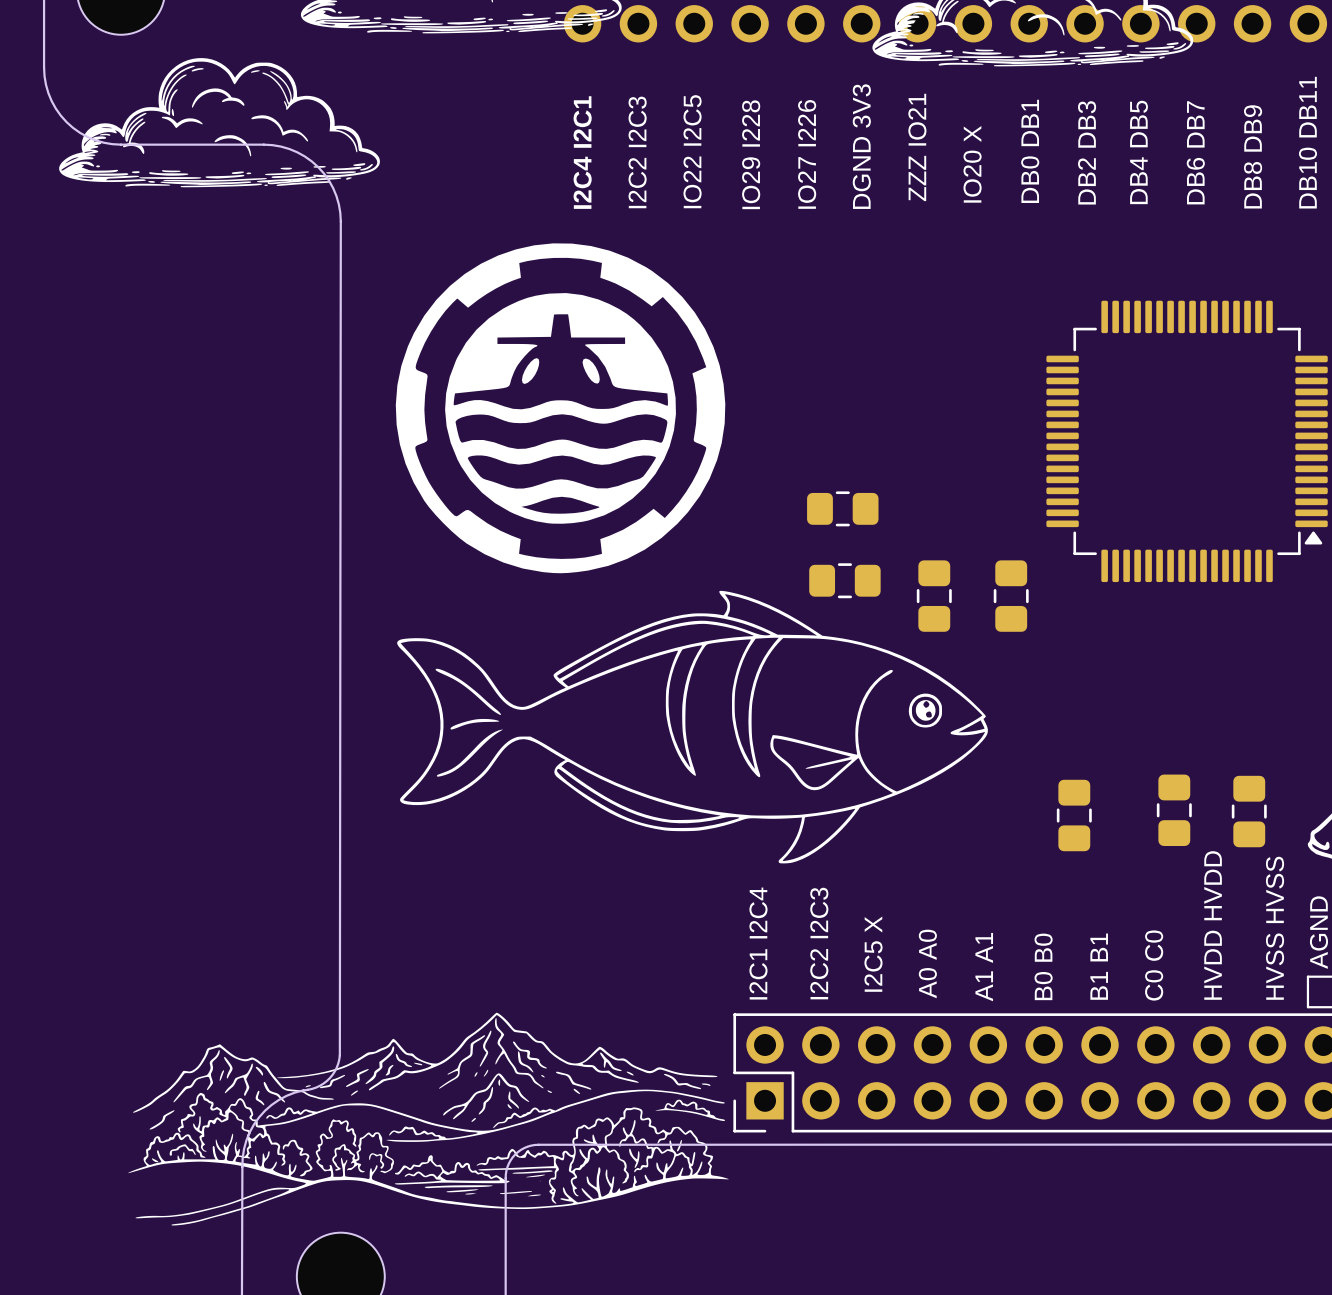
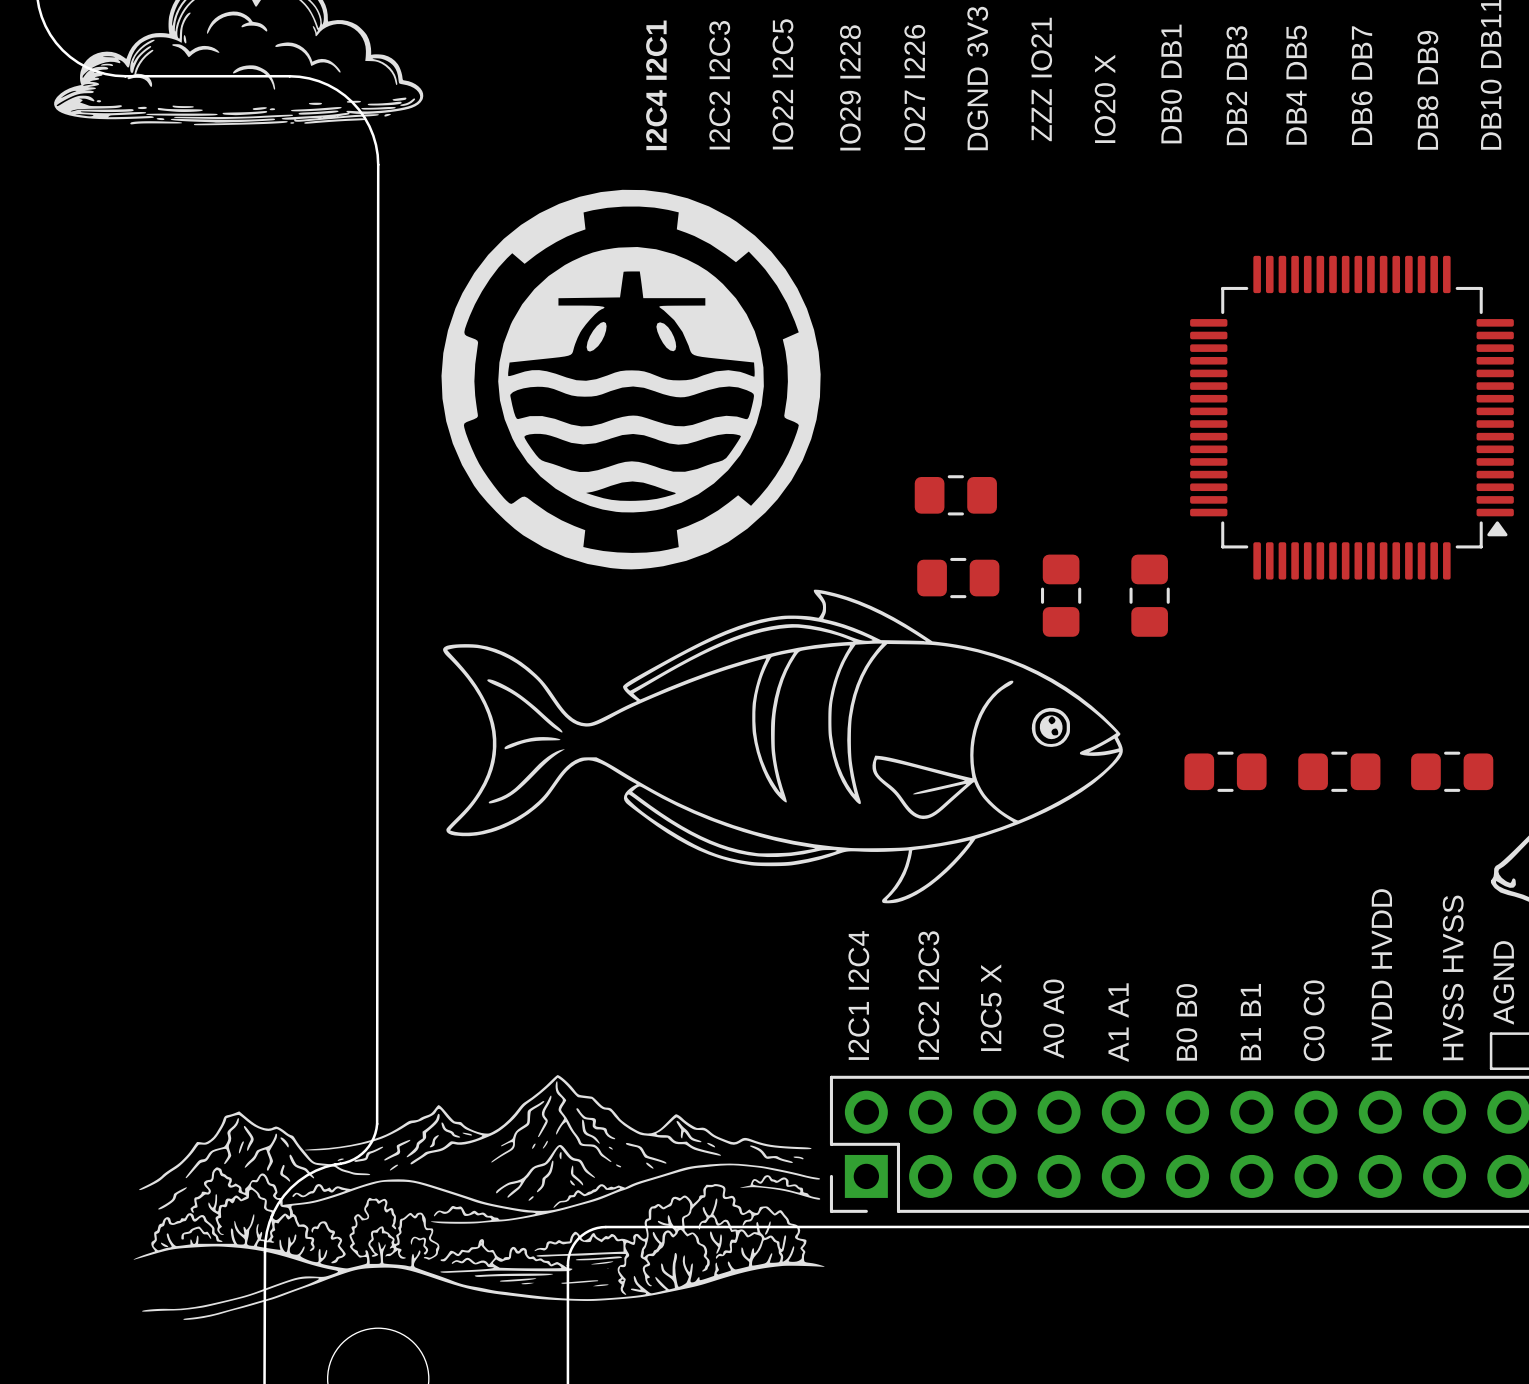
part: none -> (1225, 771)
part: none -> (1339, 771)
part: none -> (1452, 771)
part: (1174, 810) -> none
part: (1249, 811) -> none
part: (1074, 815) -> none

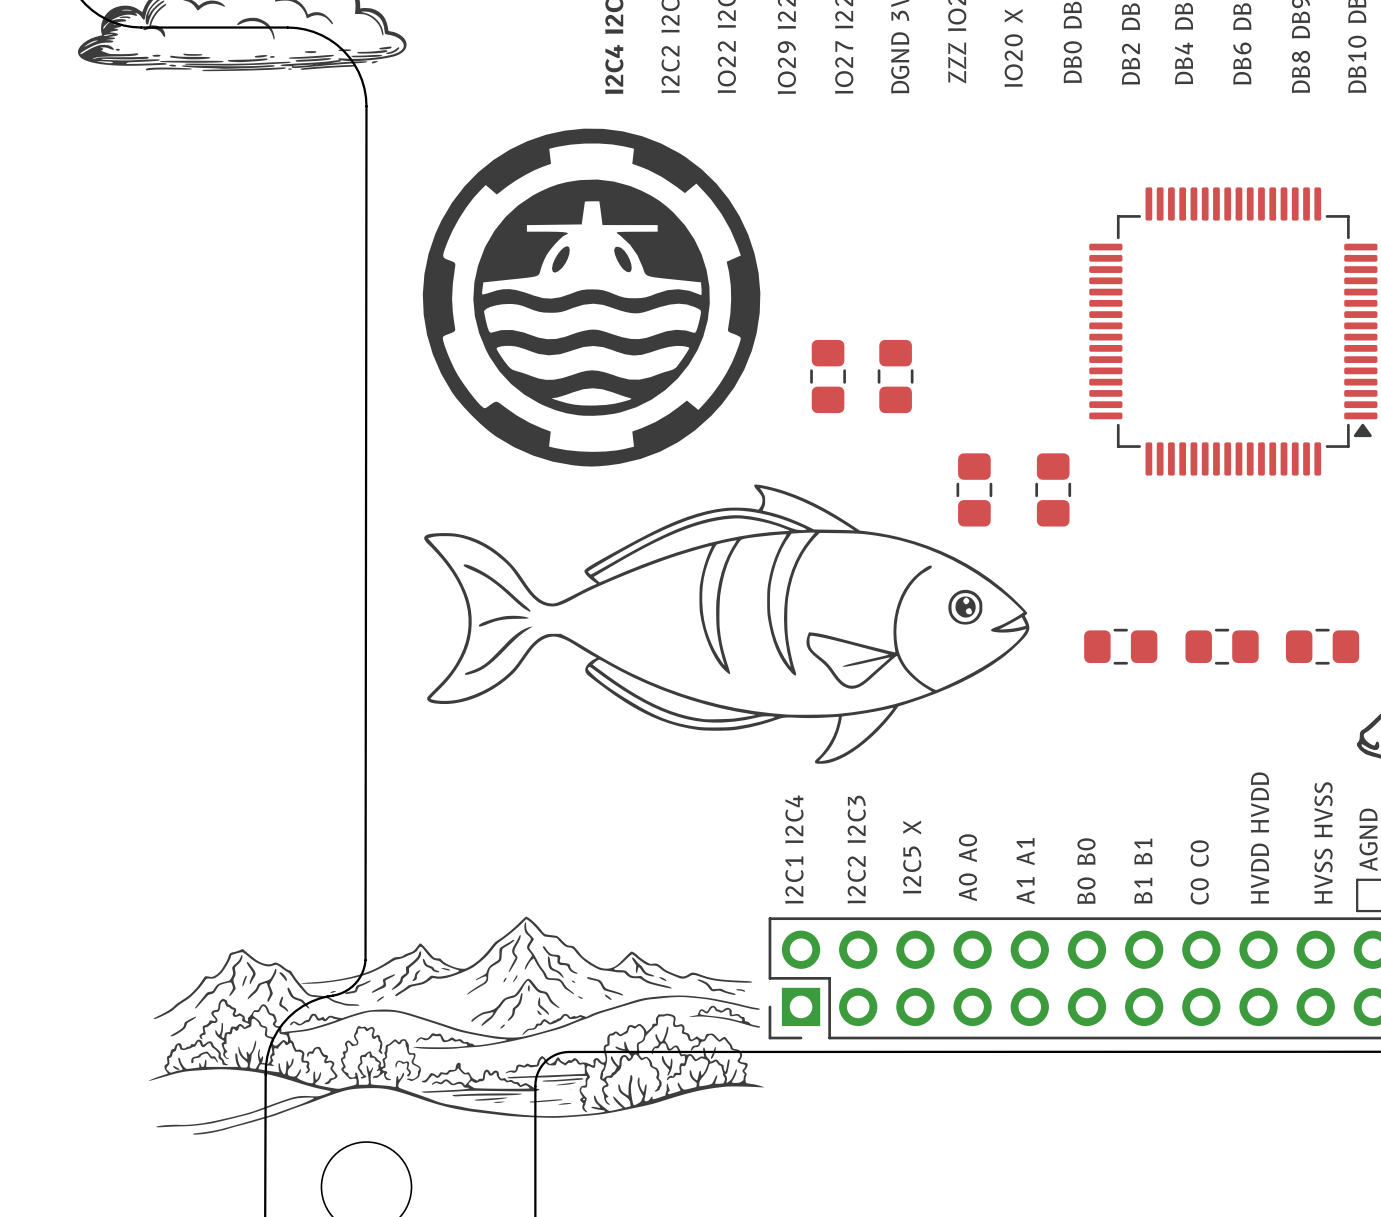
part: none -> (828, 376)
part rotation: 0° (955, 495) -> 90° clockwise (895, 376)
part: (958, 578) -> none

